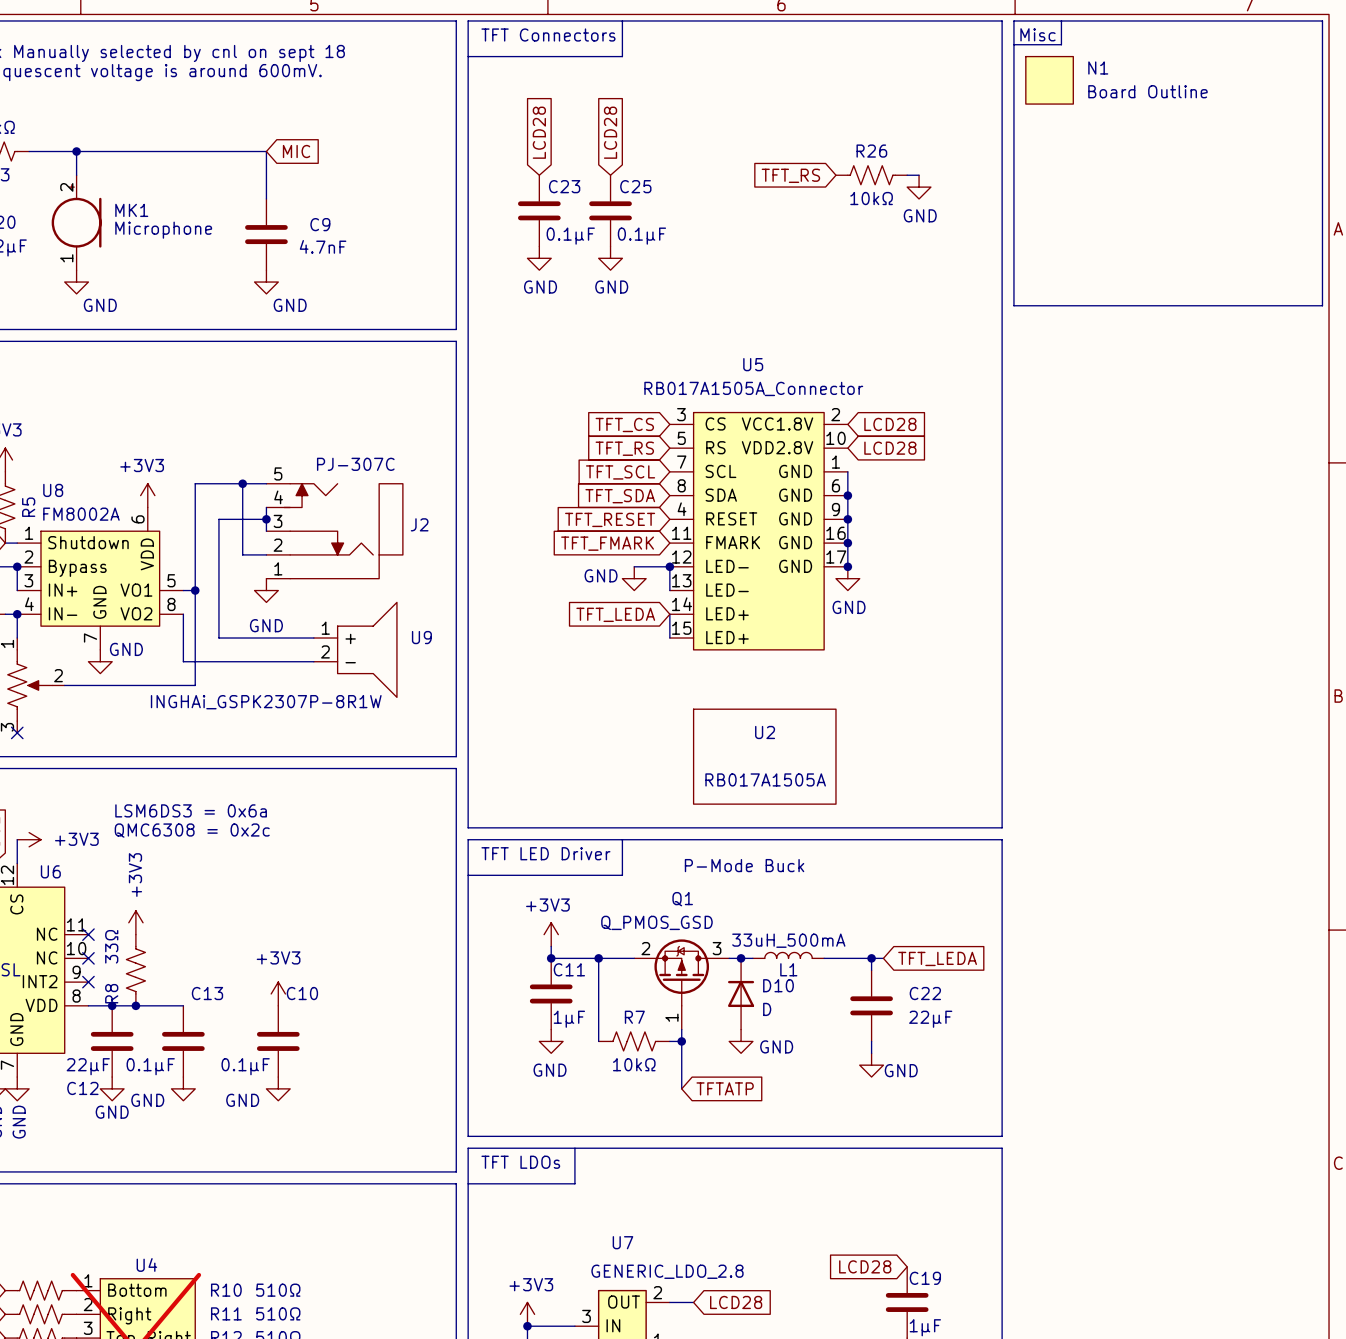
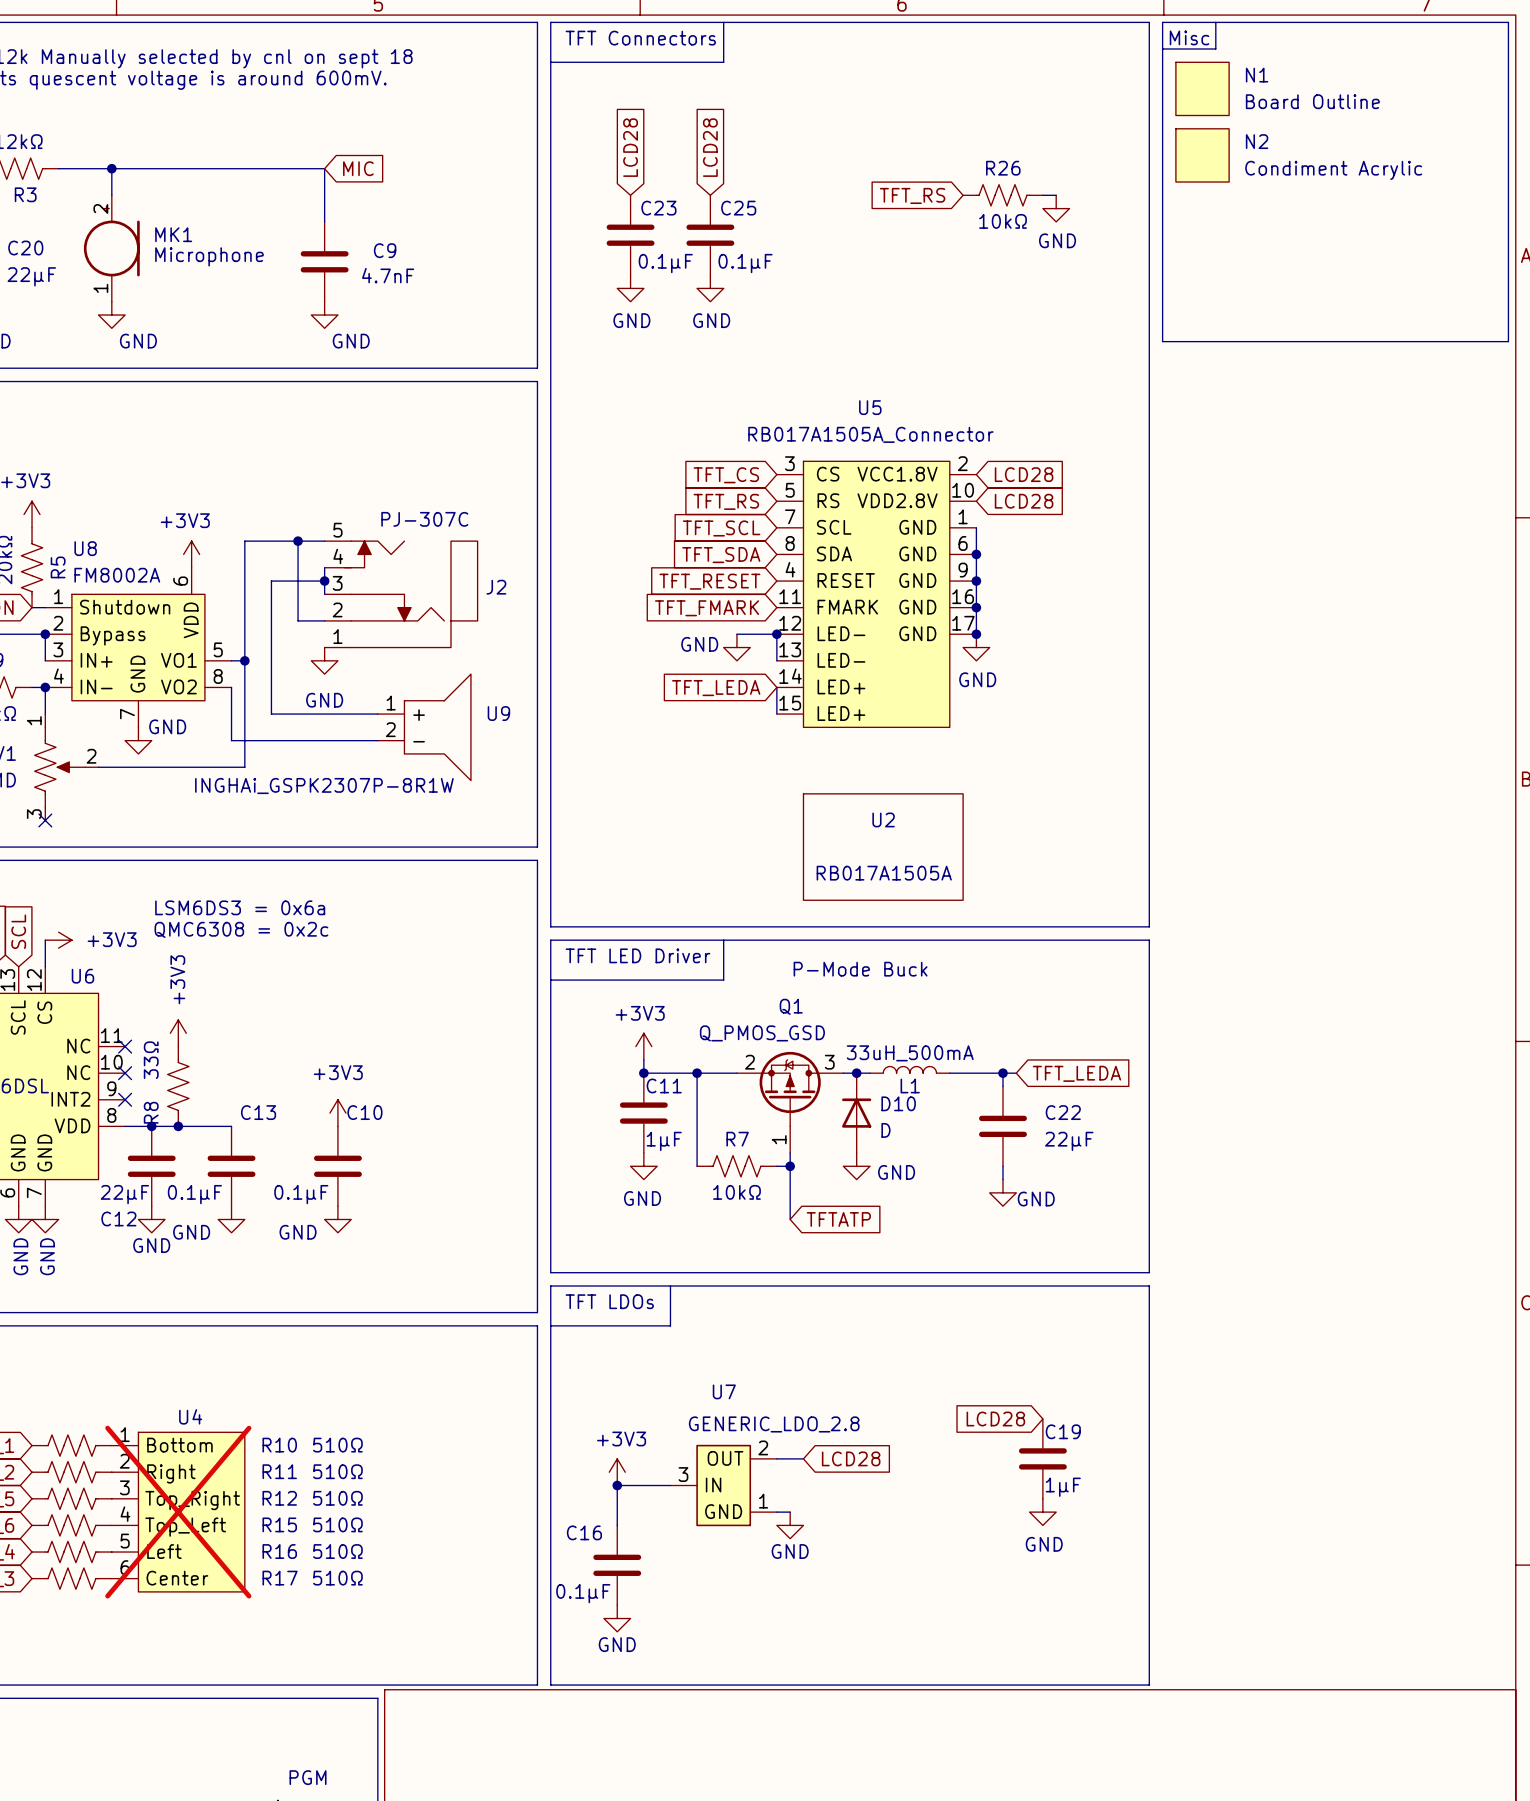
N2: none -> Condiment Acrylic (1202, 155)

